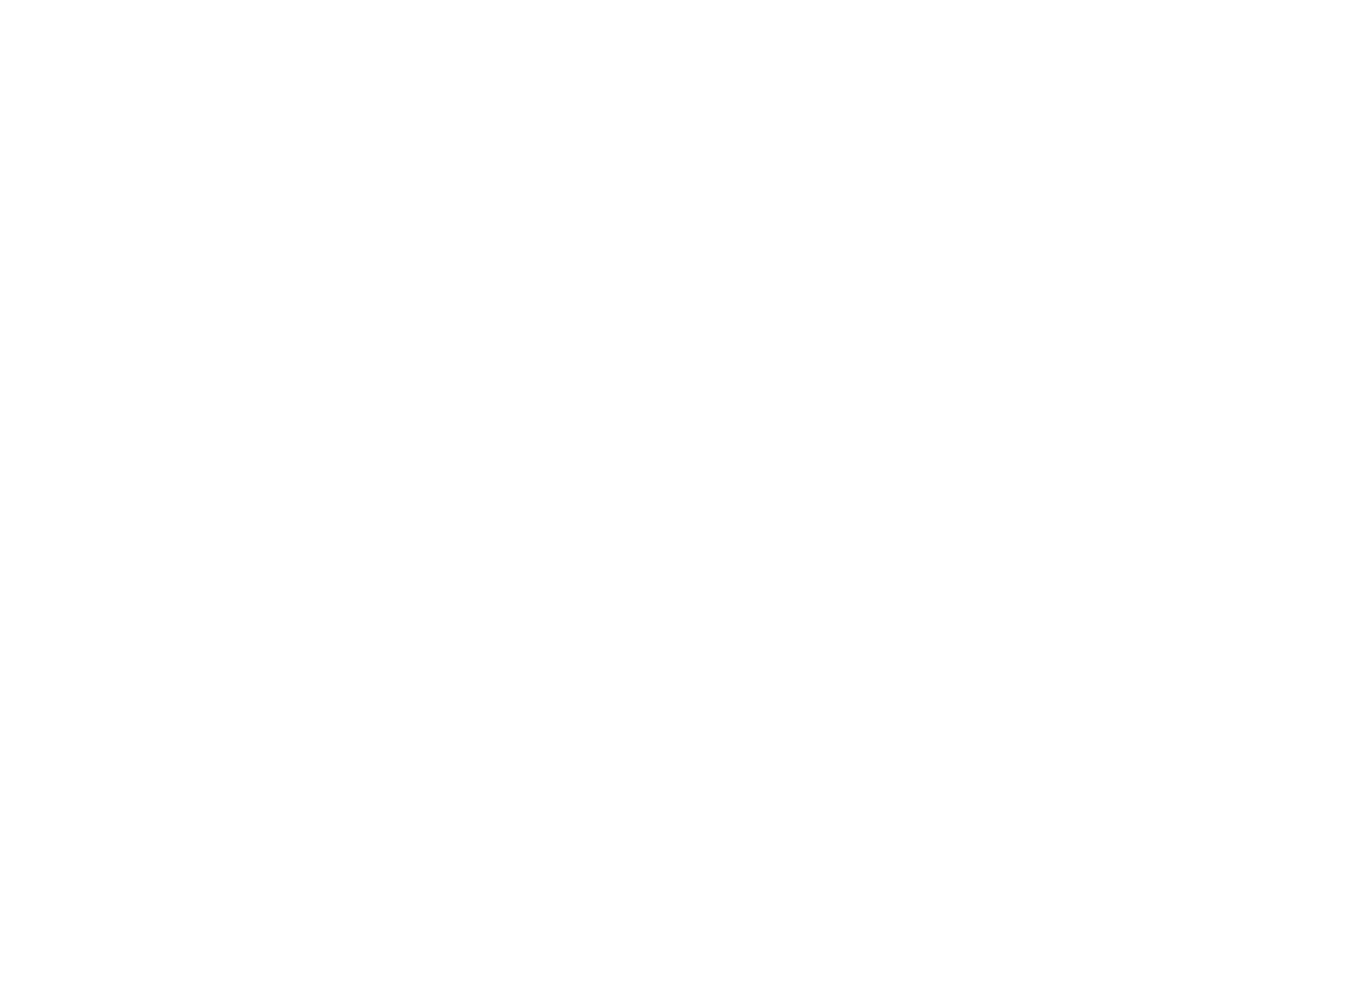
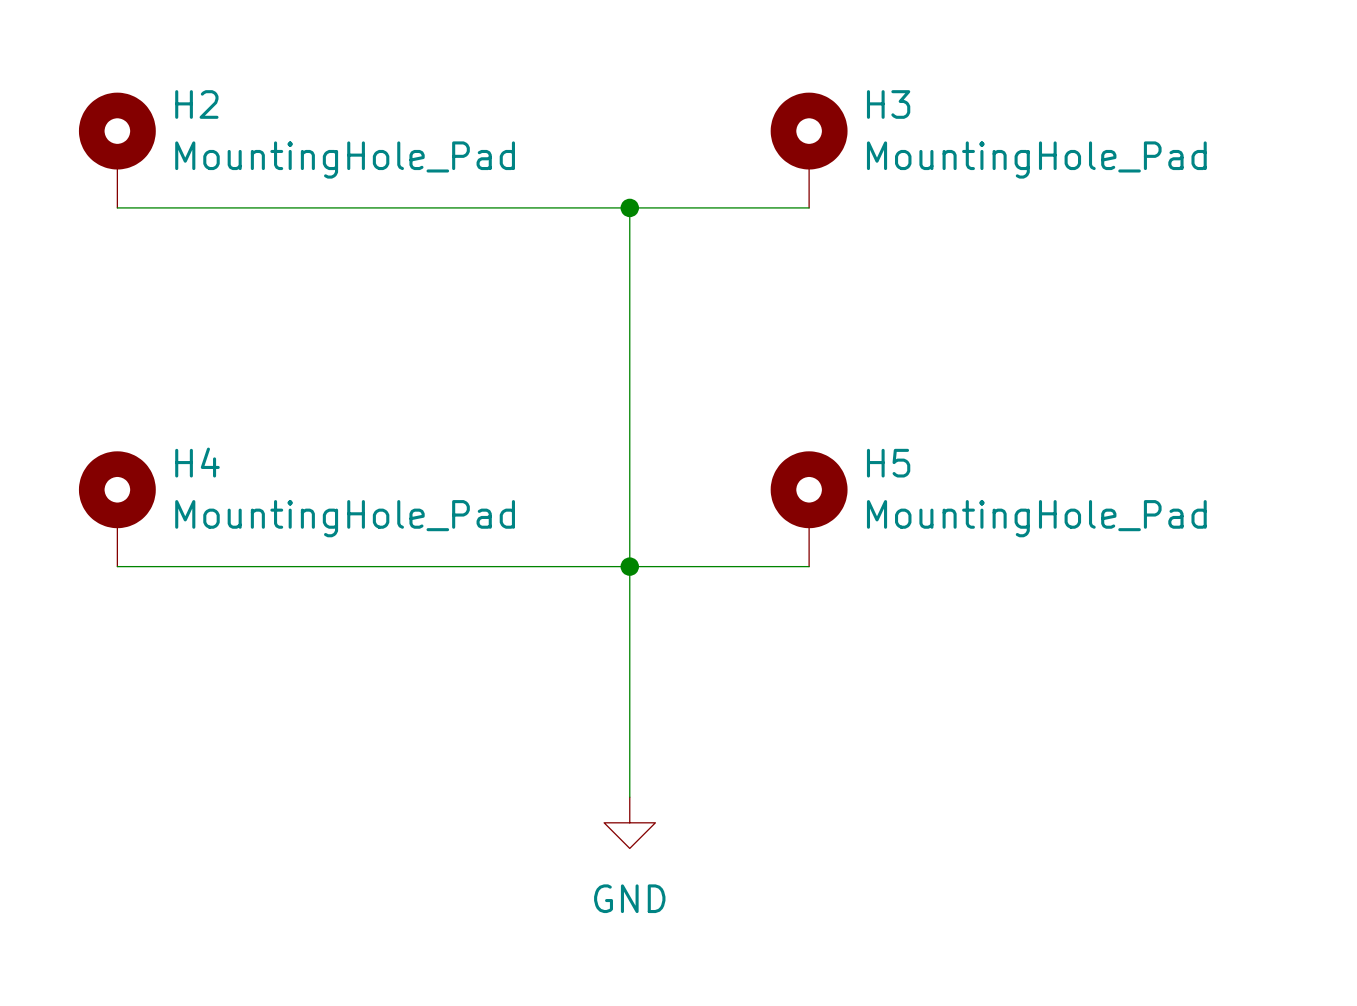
H2: none -> MountingHole_Pad (117, 150)
H3: none -> MountingHole_Pad (809, 150)
wire: none -> (117, 207) (809, 207)
wire: none -> (629, 207) (629, 797)
junction: none -> (629, 207)
H4: none -> MountingHole_Pad (117, 508)
H5: none -> MountingHole_Pad (809, 508)
wire: none -> (117, 566) (809, 566)
junction: none -> (629, 566)
power symbol: none -> GND (629, 822)

